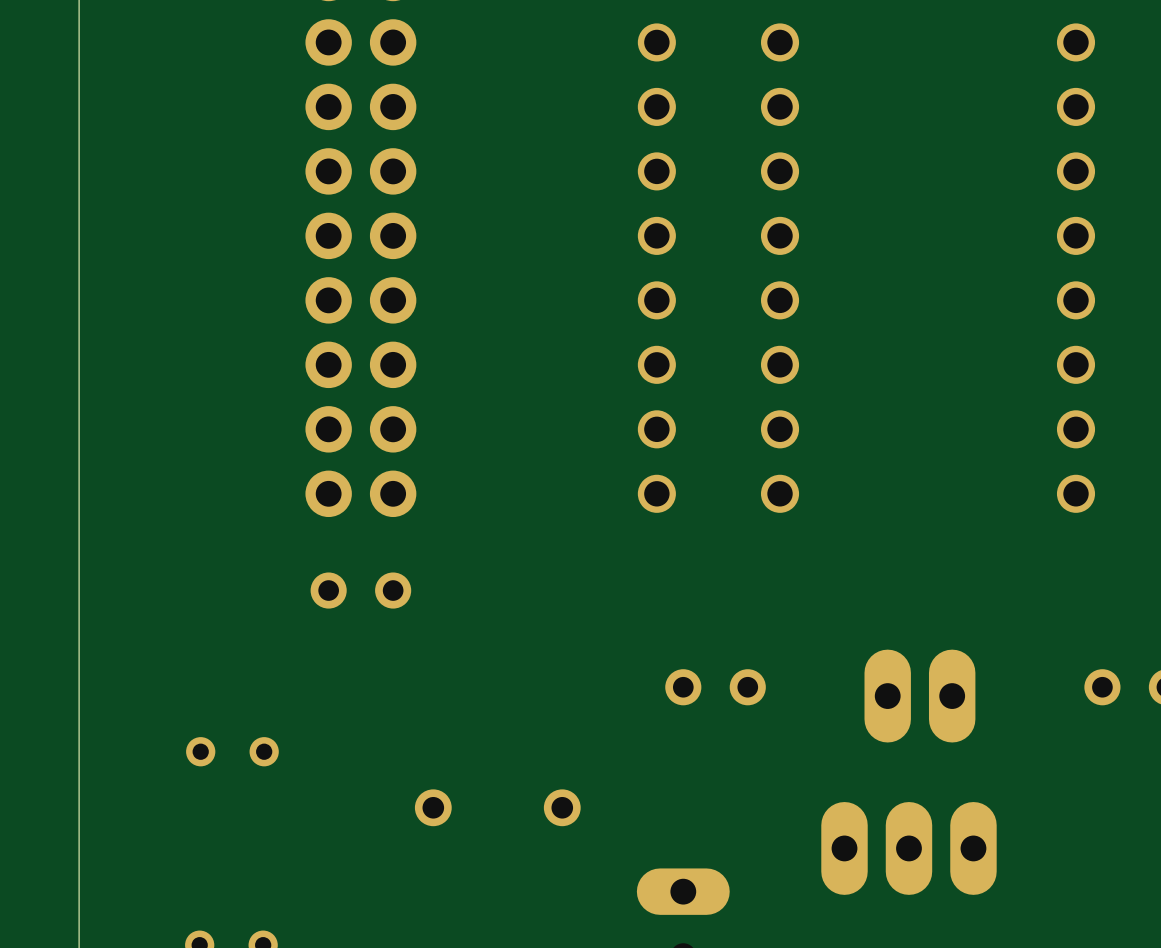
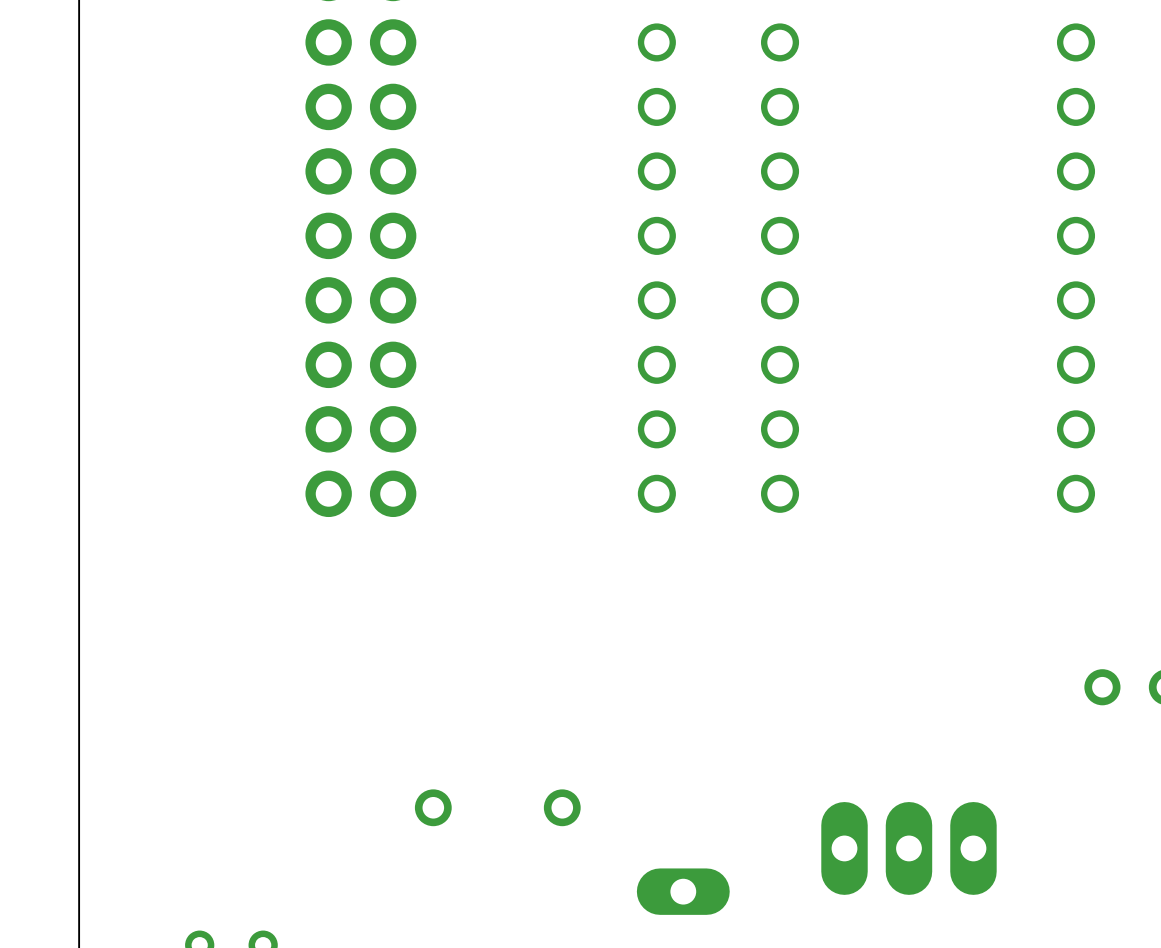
part: (360, 590) -> none
part: (715, 687) -> none
part: (919, 696) -> none
part: (232, 751) -> none

